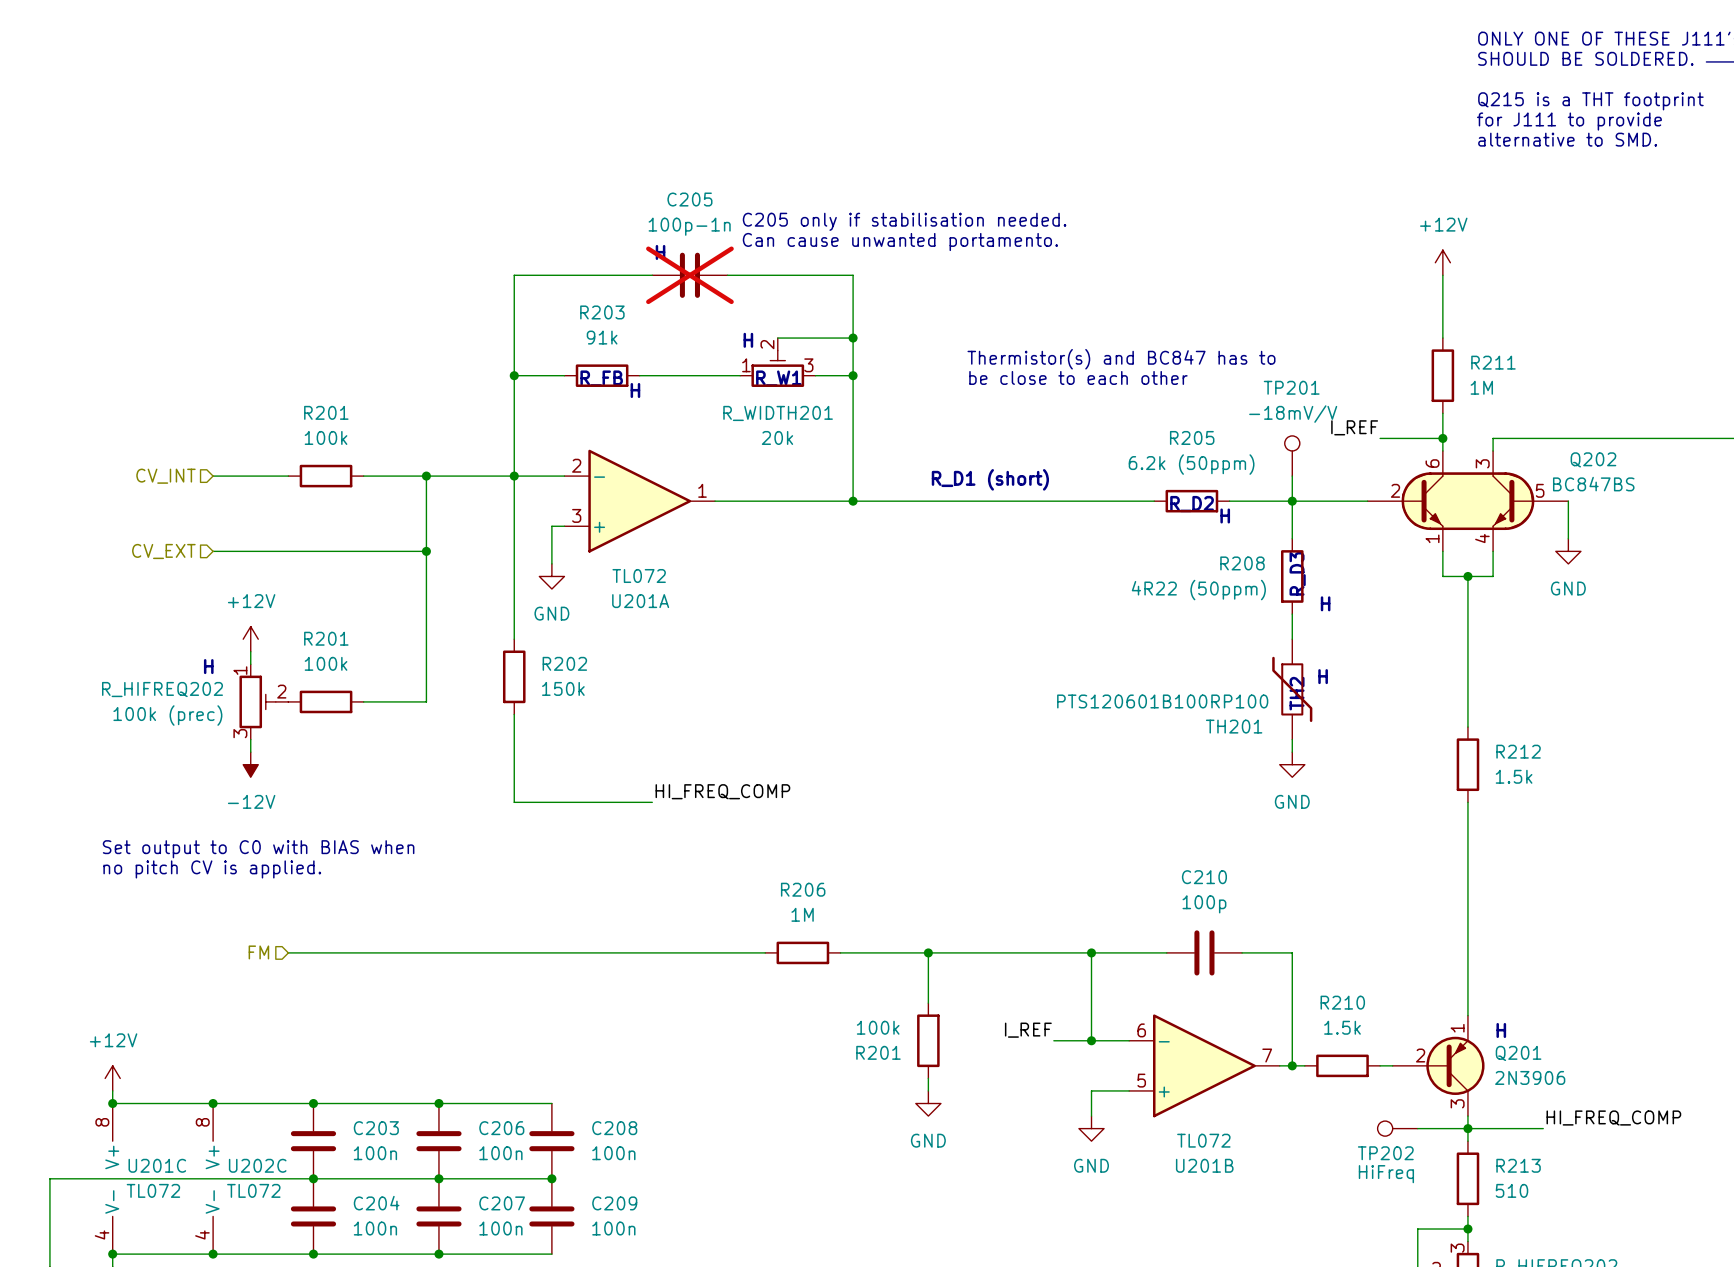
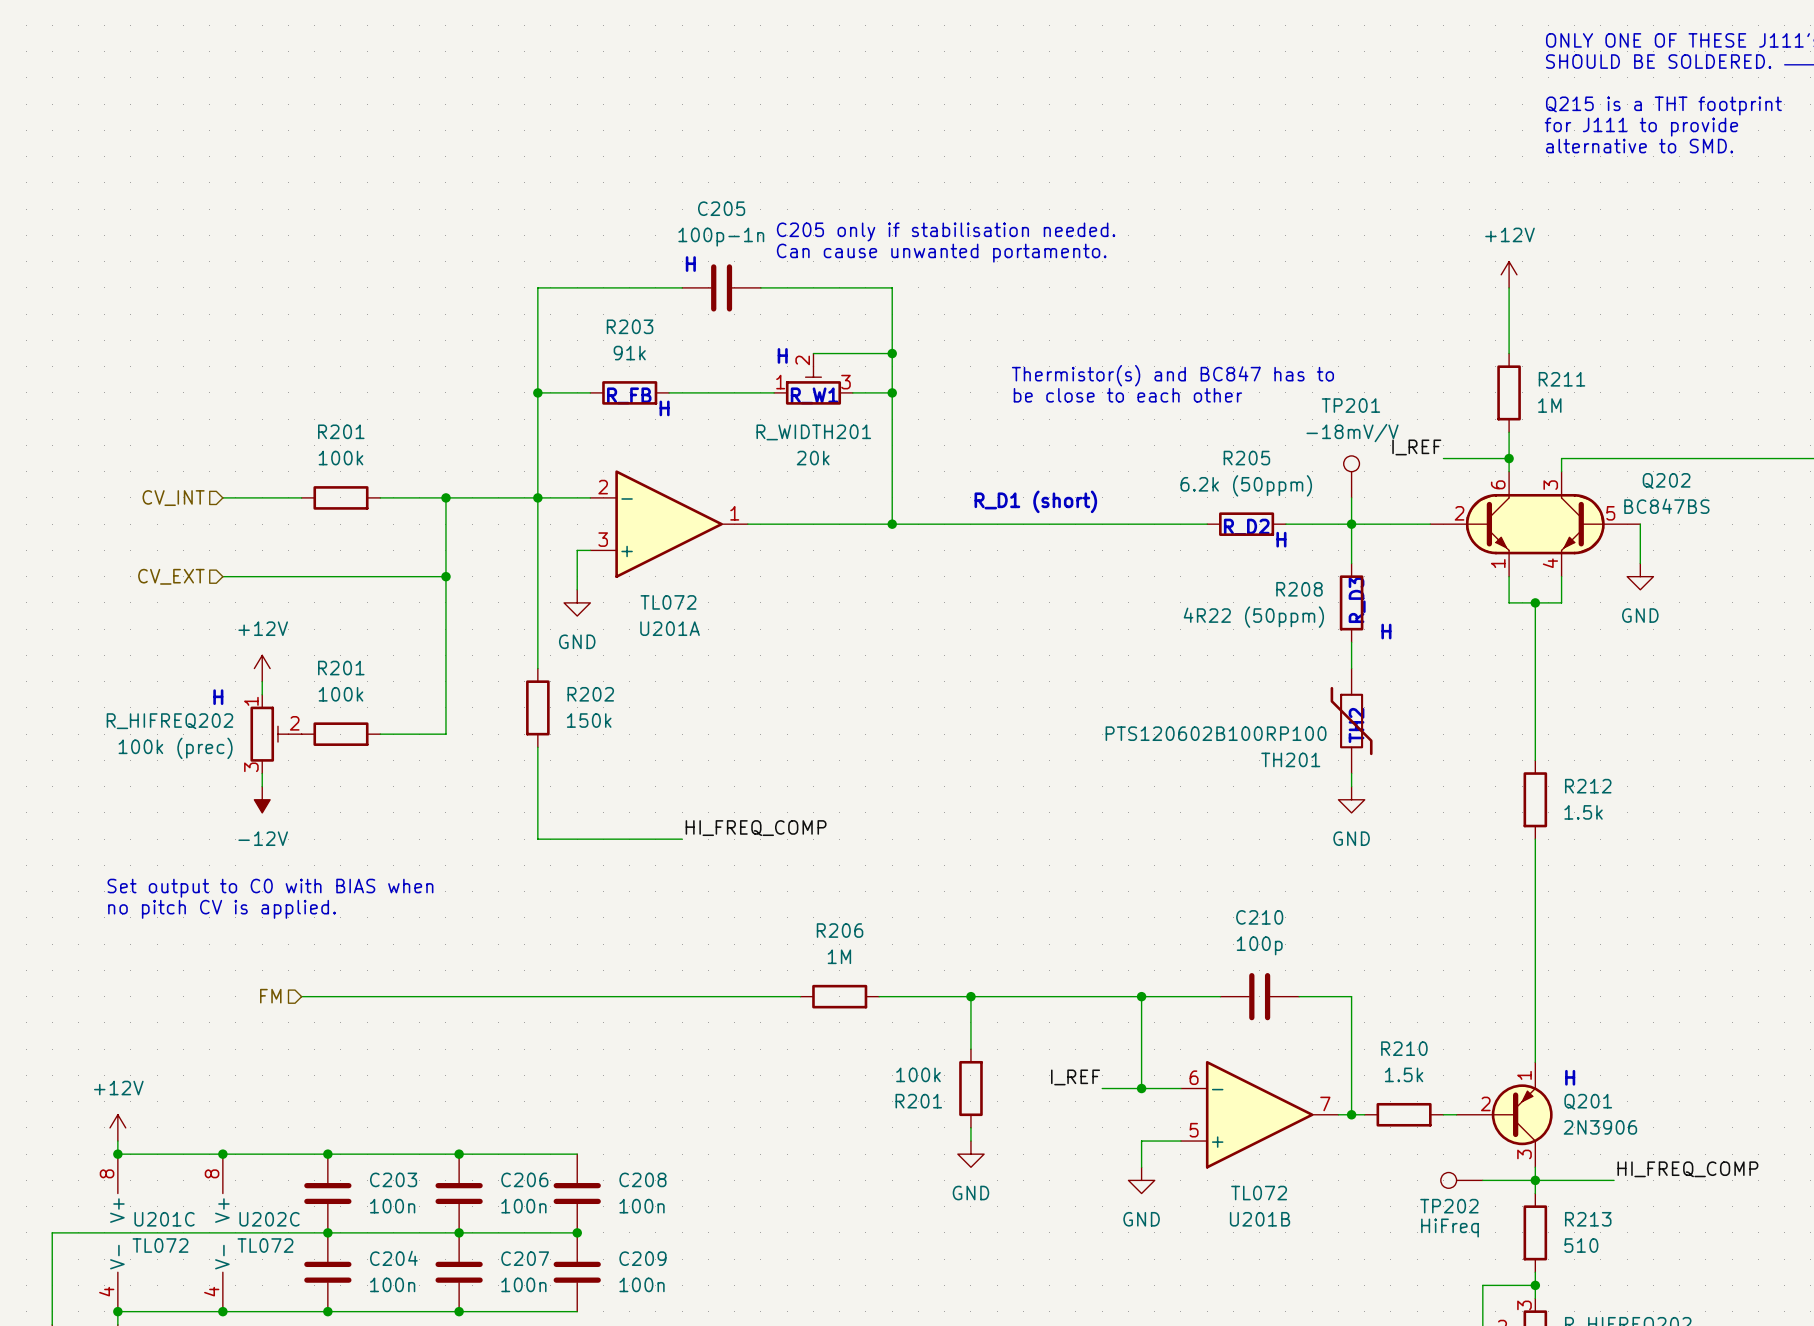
C205 do-not-place cross: (689, 275) -> none
text: H (1323, 676) -> none
TH201 value: PTS120601B100RP100 (1162, 701) -> PTS120602B100RP100 (1216, 733)

